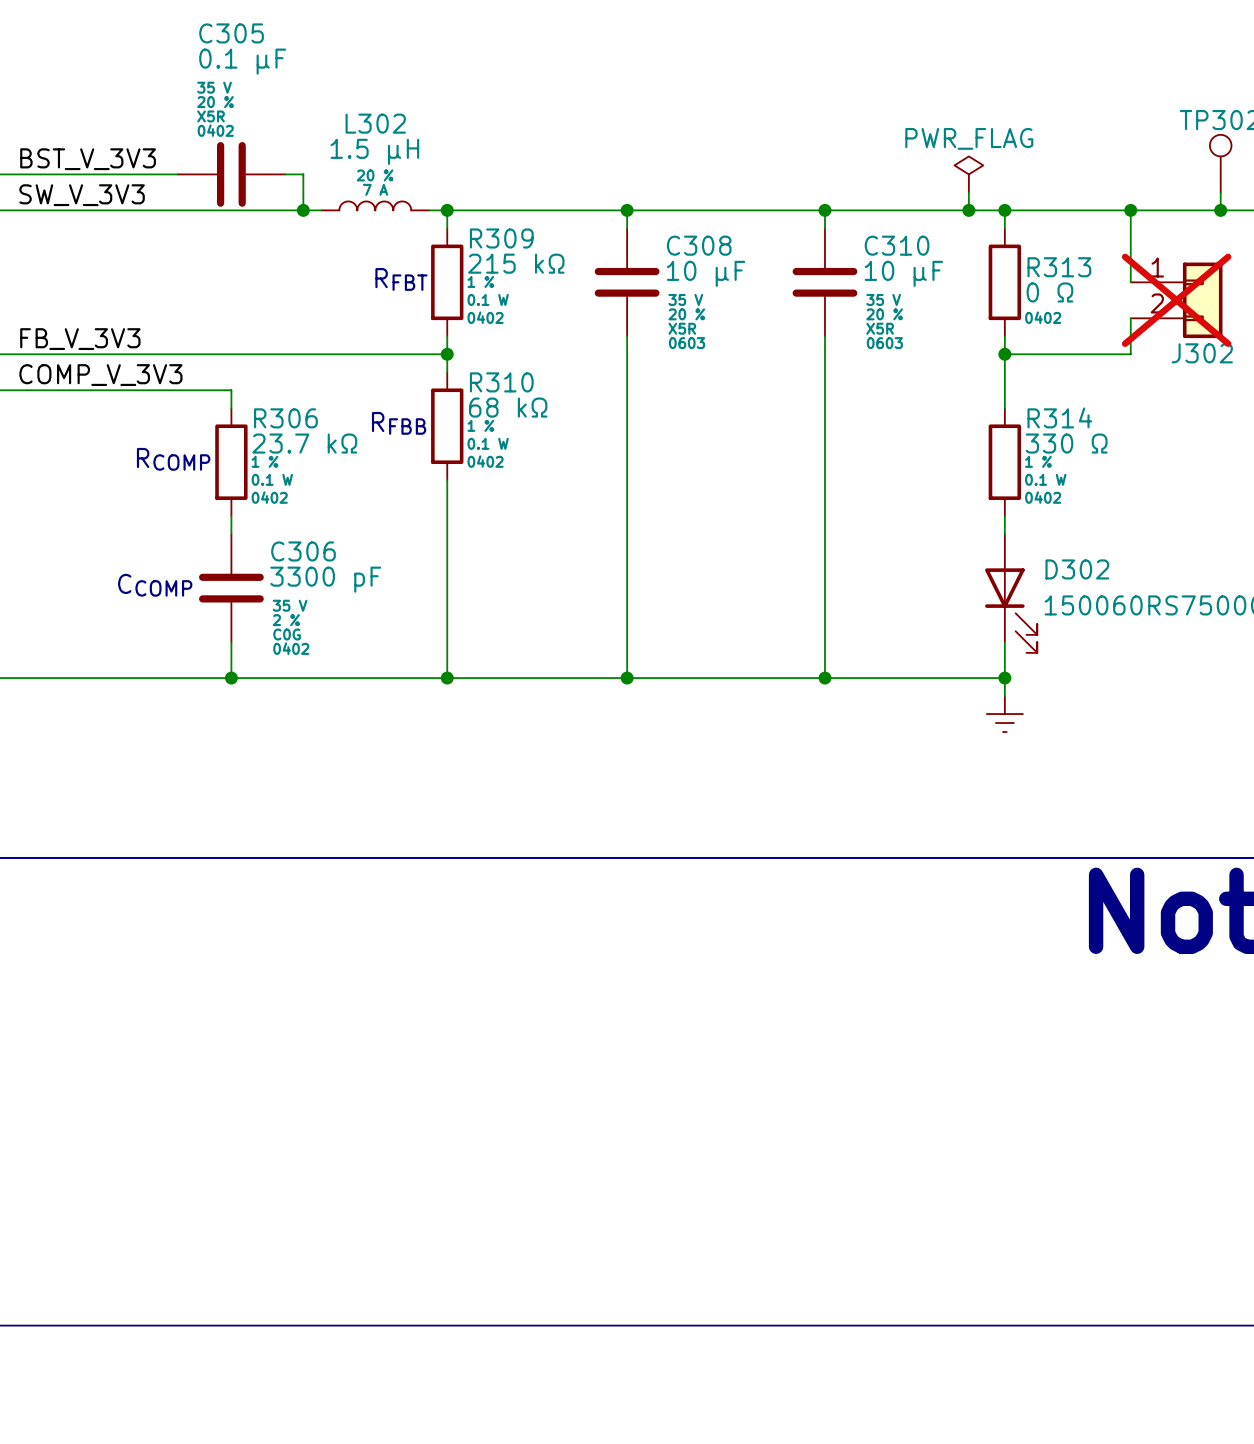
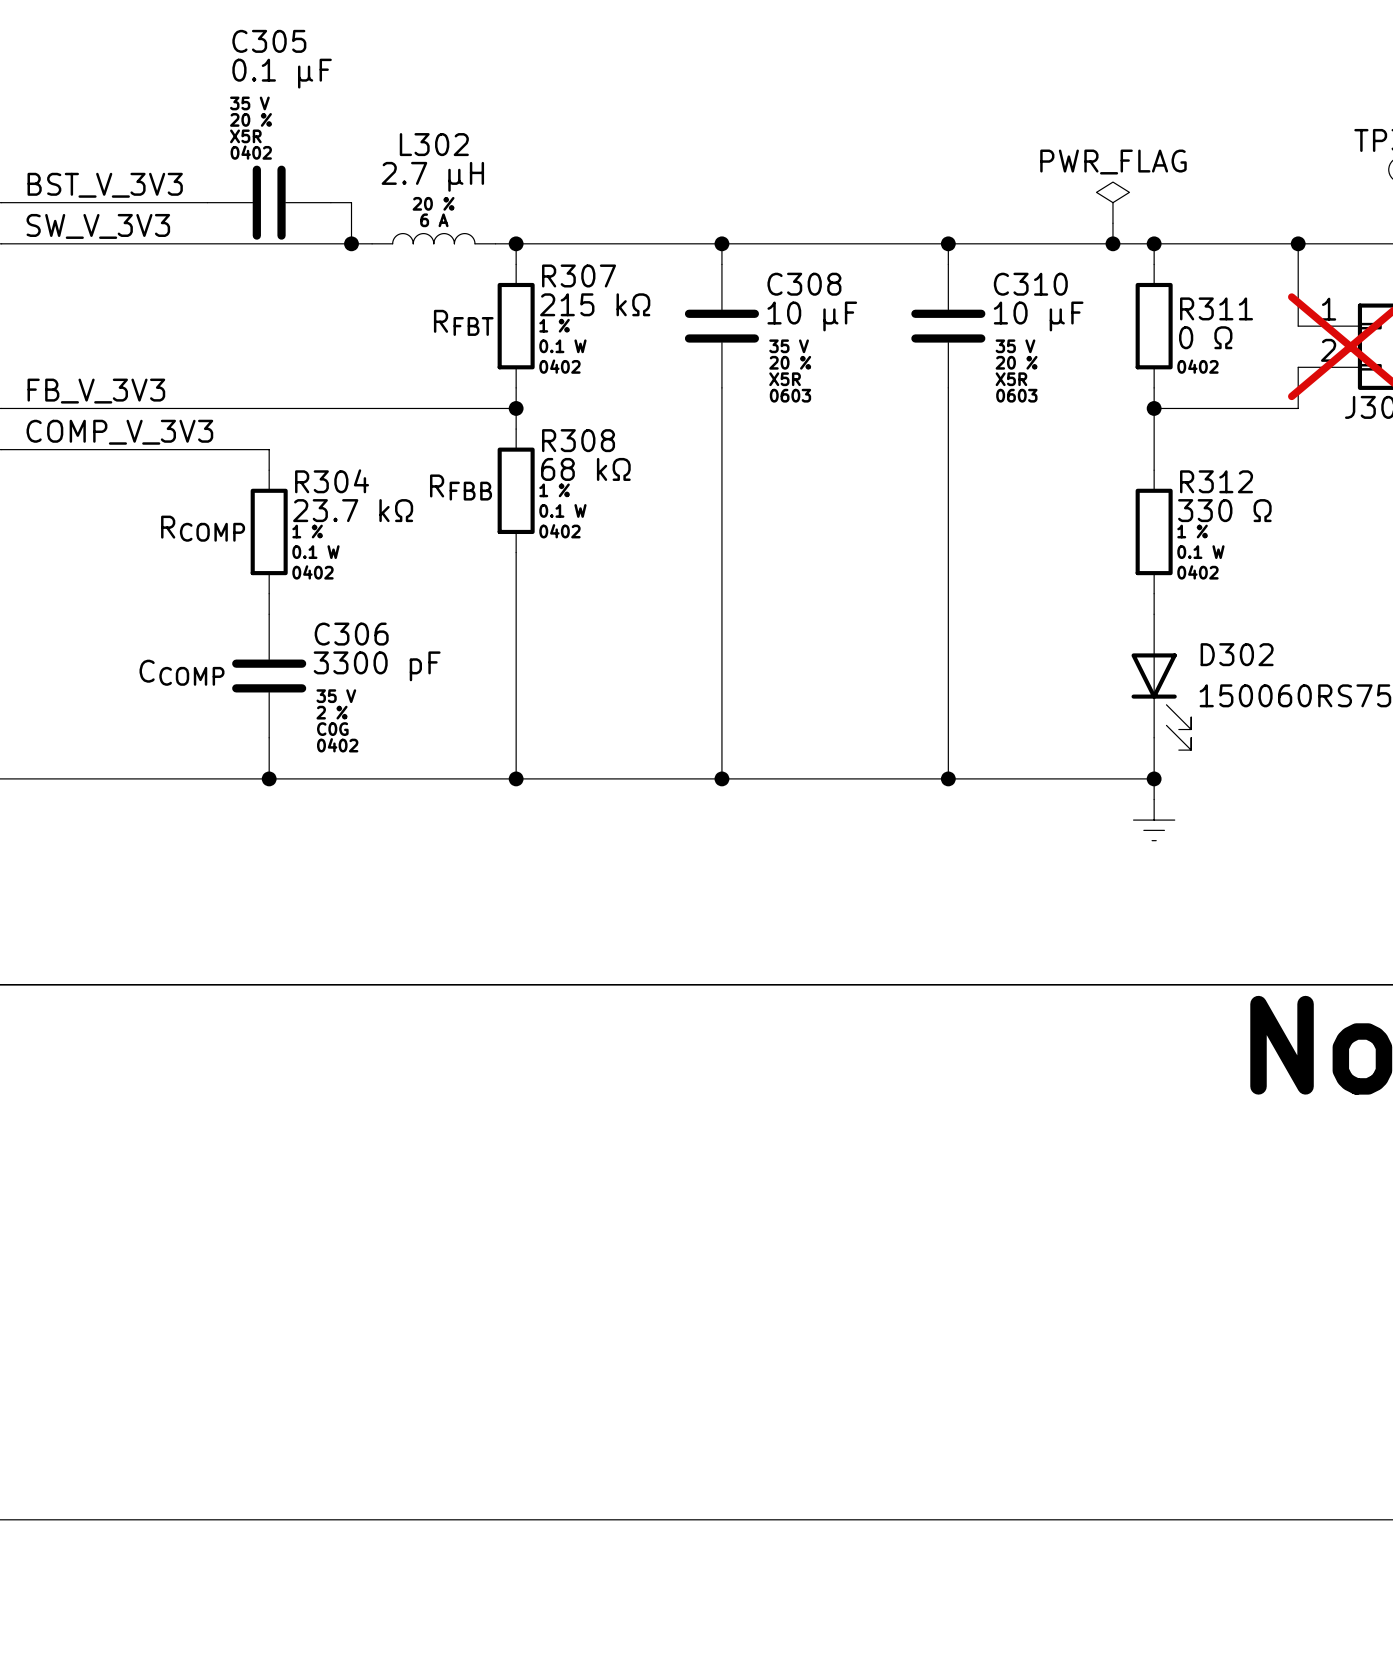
L302 value: 1.5 µH (374, 151) -> 2.7 µH (432, 176)
L302 text: 7 A (375, 189) -> 6 A (434, 220)
R309 name: R309 (501, 238) -> R307 (579, 275)
R313 name: R313 (1059, 267) -> R311 (1216, 308)
R310 name: R310 (501, 382) -> R308 (578, 440)
R314 name: R314 (1059, 417) -> R312 (1216, 481)
R306 name: R306 (285, 418) -> R304 (332, 481)

